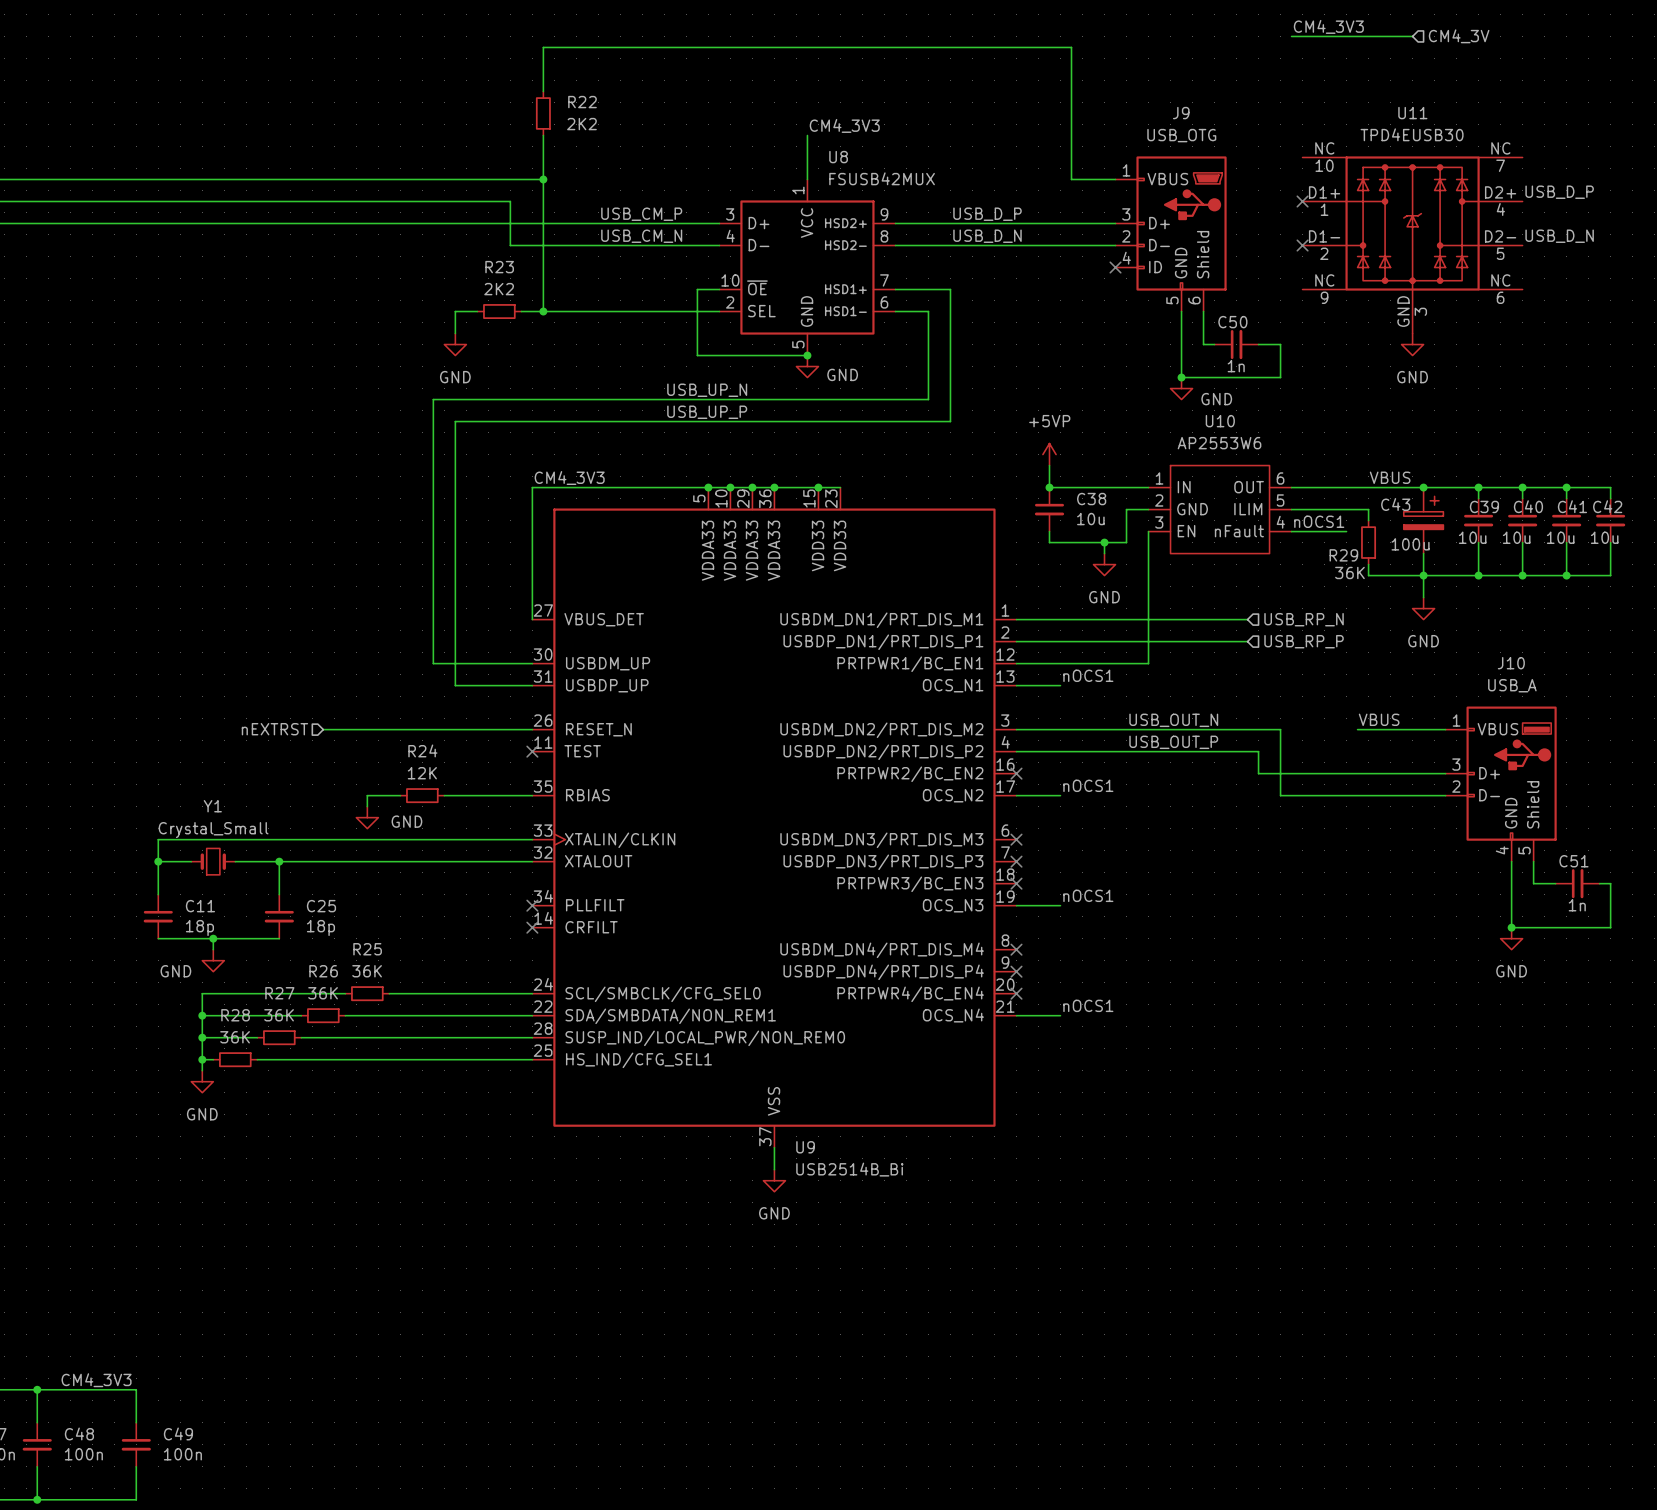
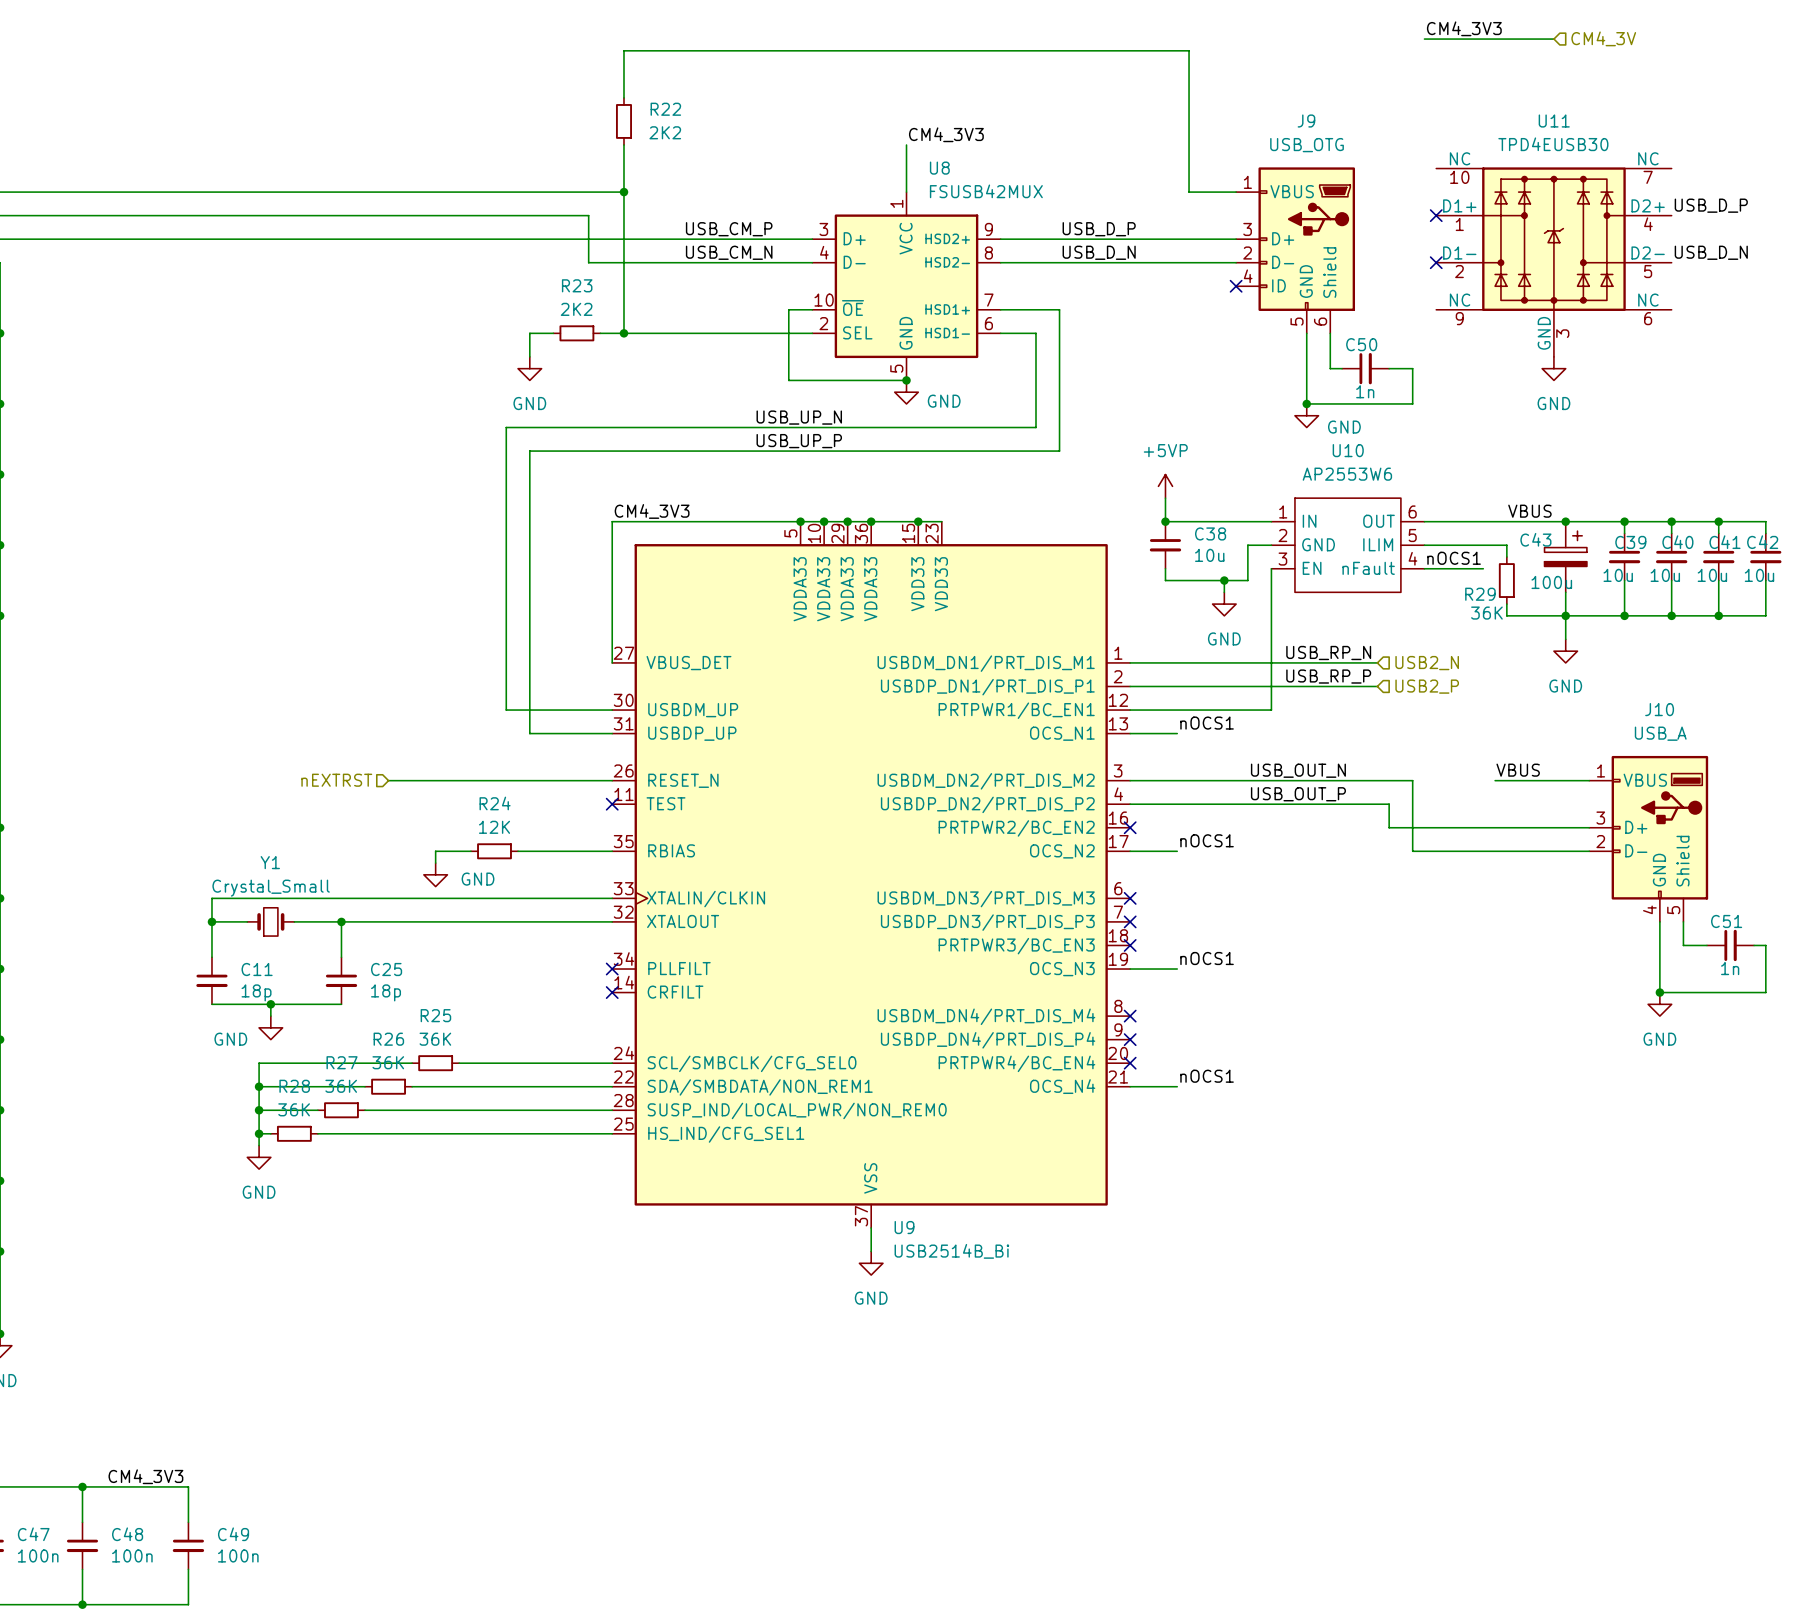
label: none -> USB_RP_N (1328, 653)
hierarchical label: USB_RP_N (1304, 619) -> USB2_N (1427, 663)
label: none -> USB_RP_P (1328, 676)
hierarchical label: USB_RP_P (1304, 641) -> USB2_P (1427, 686)

